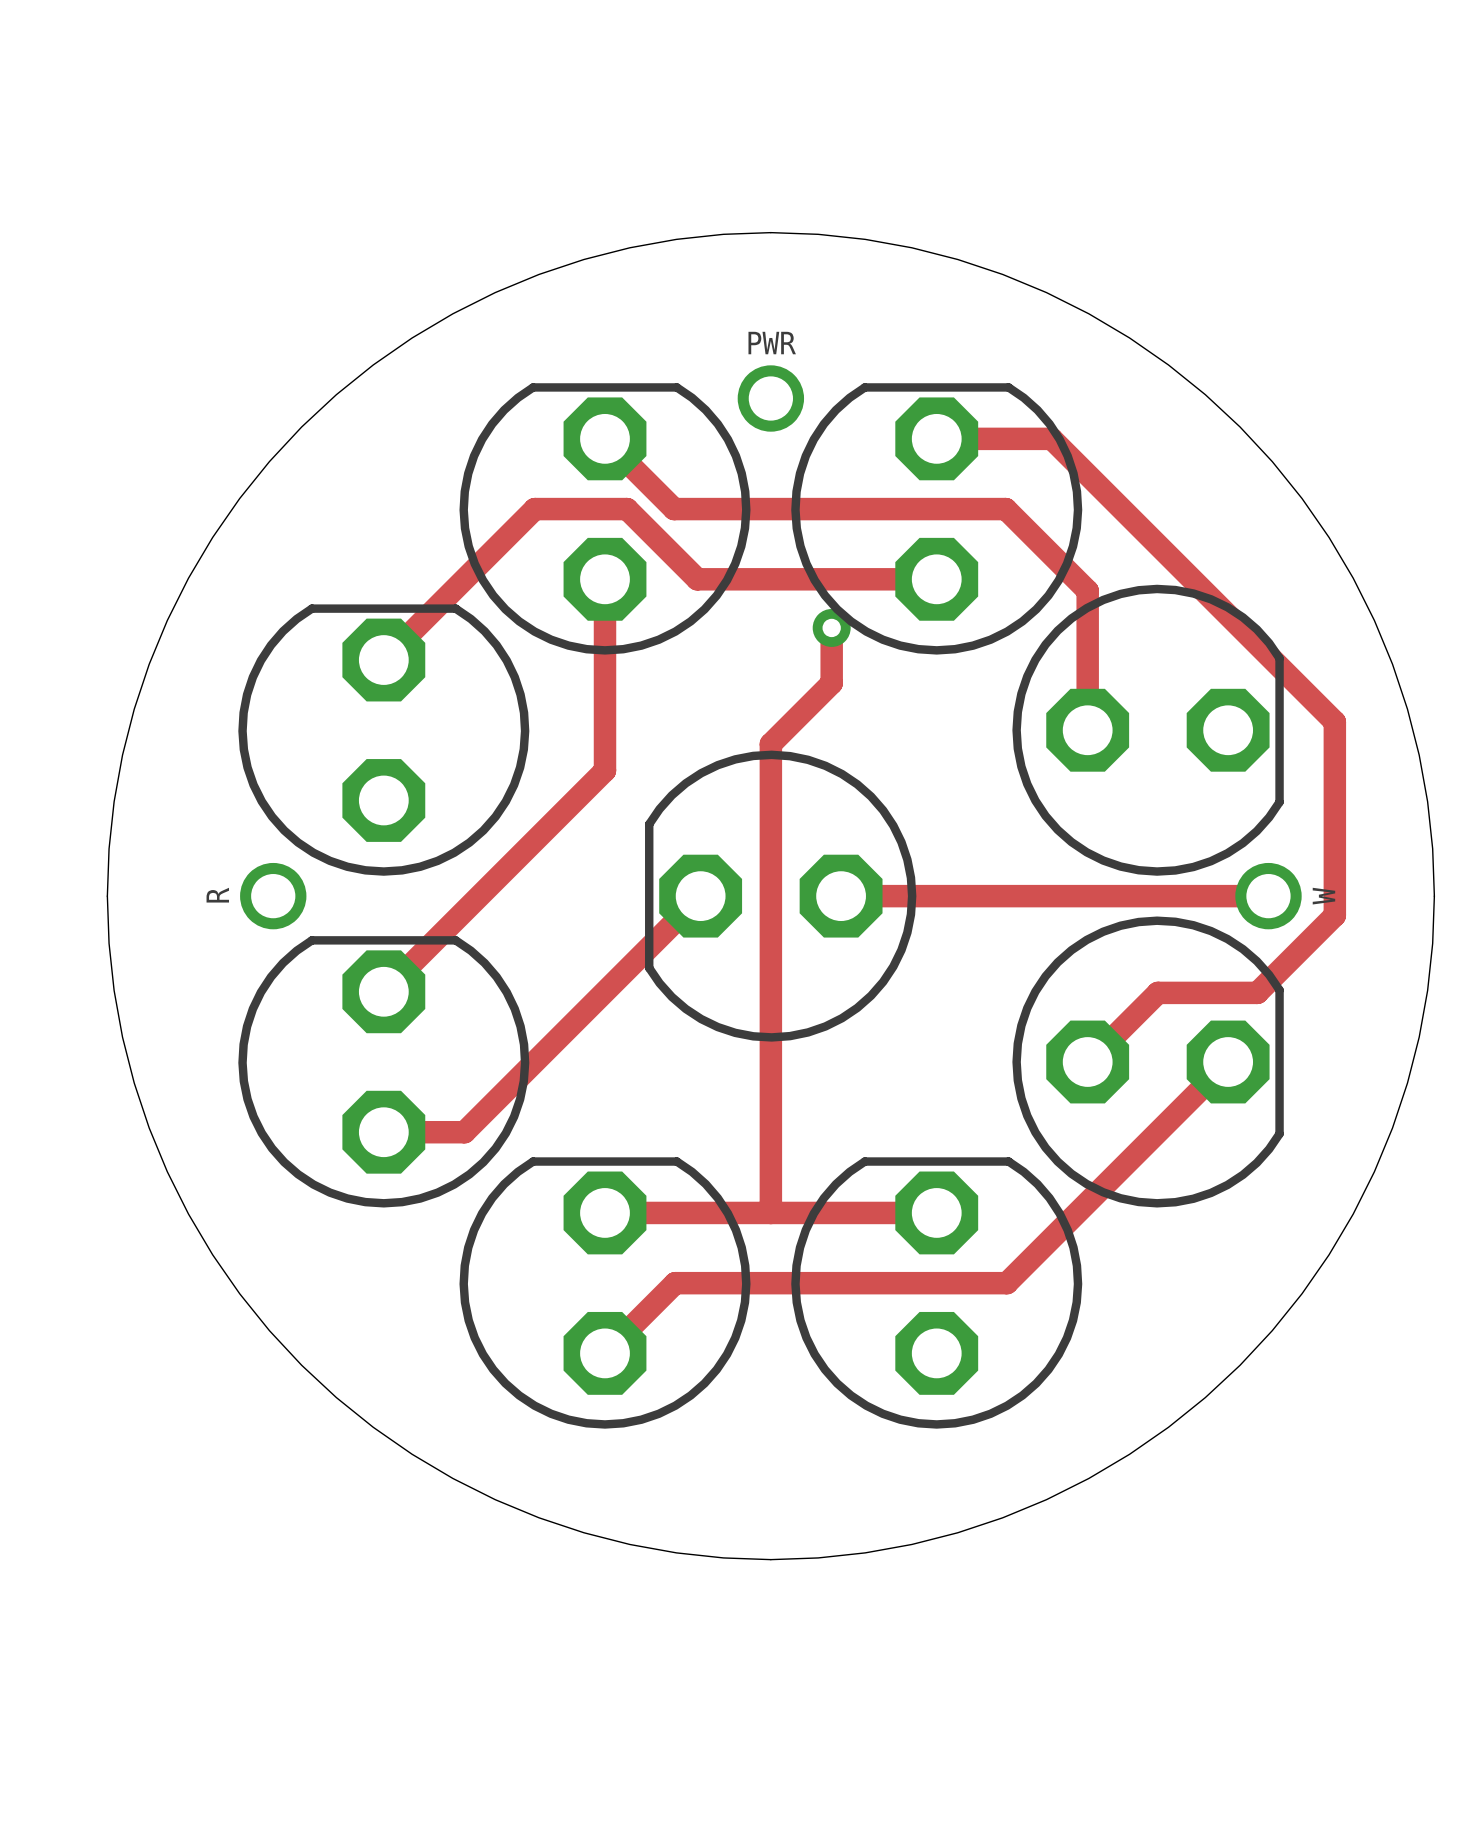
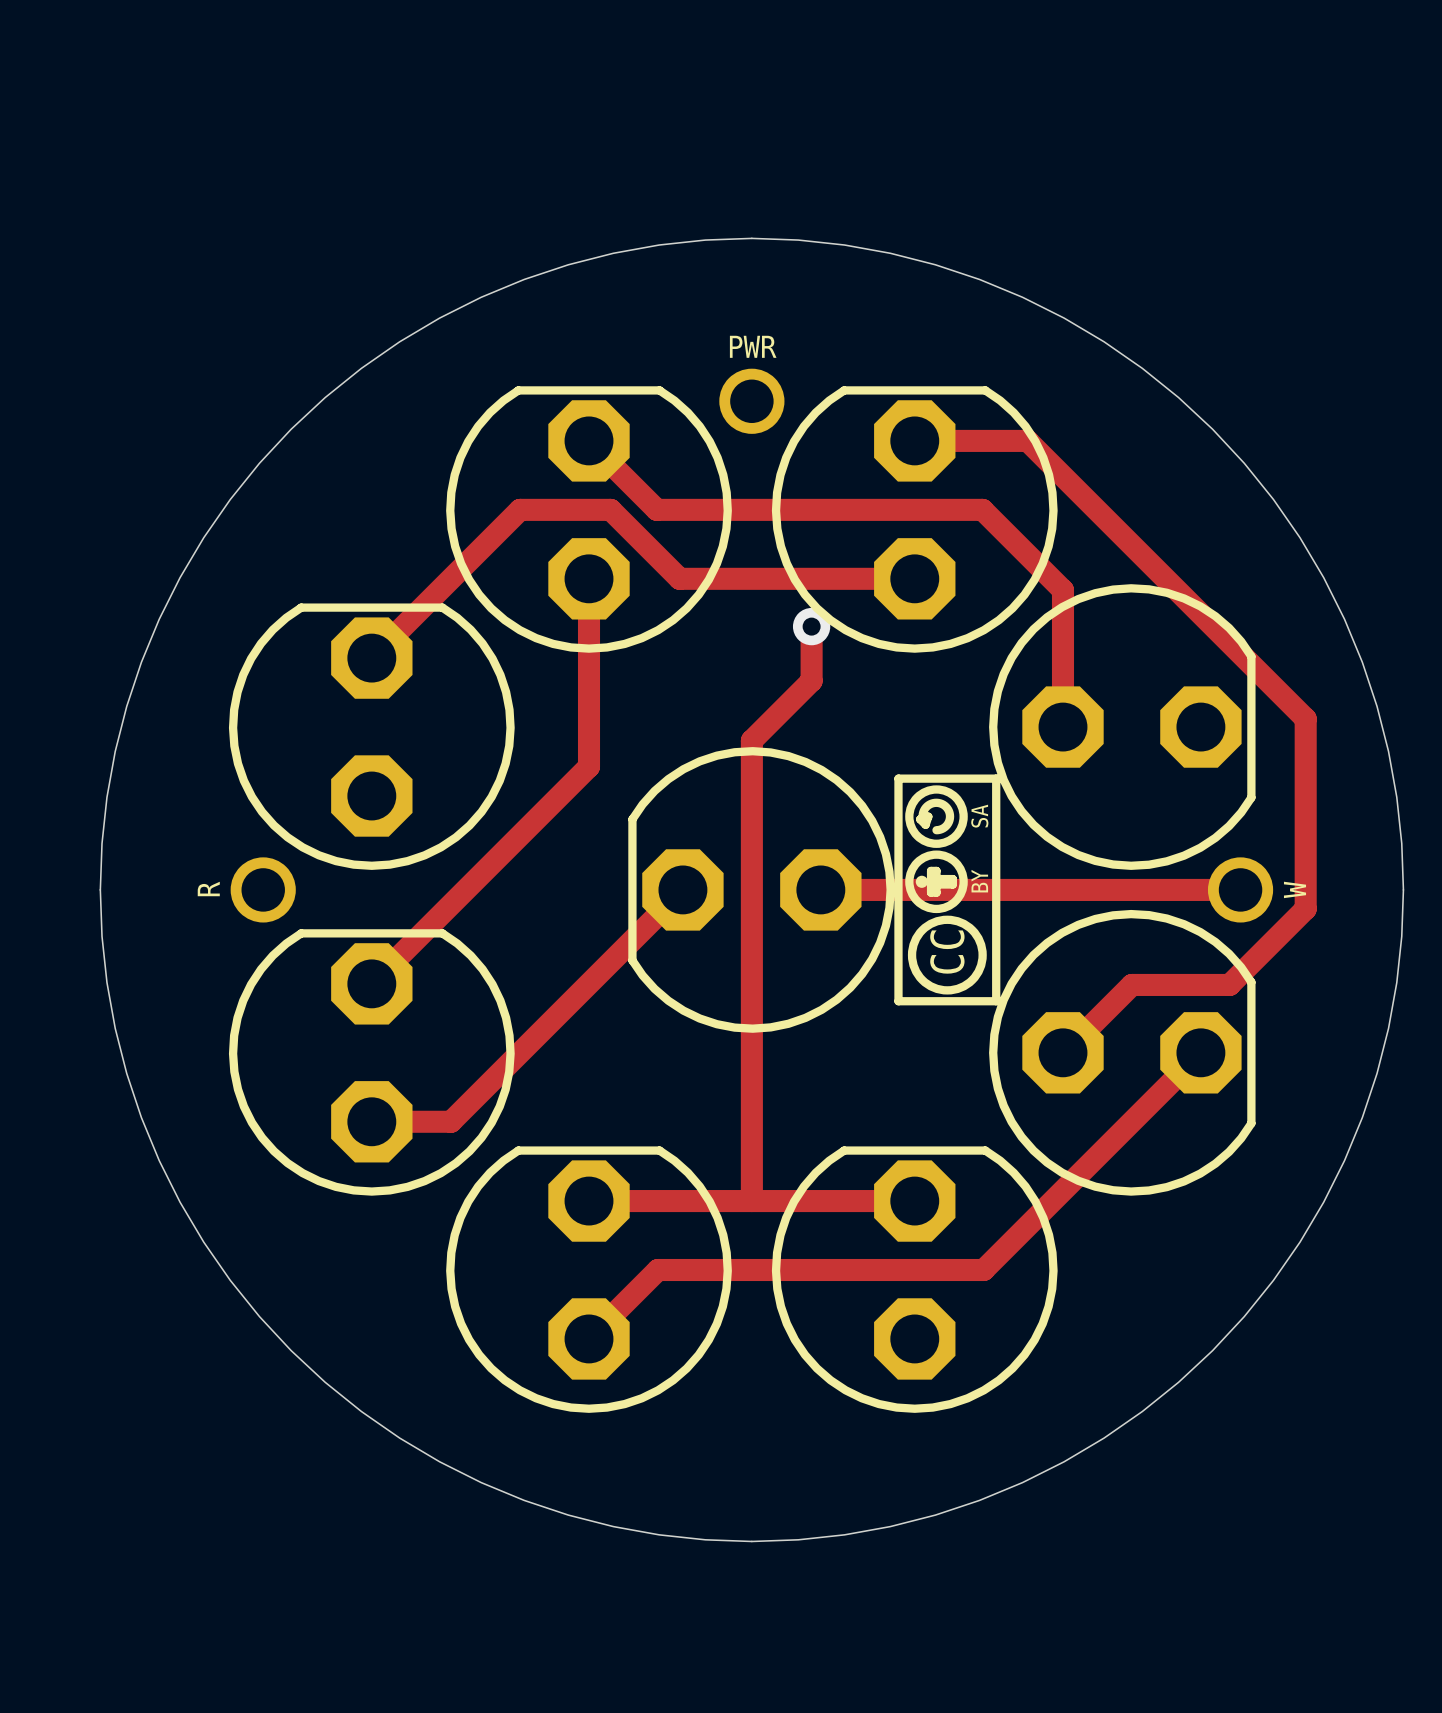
drawing: none -> [894, 774, 1001, 1006]

